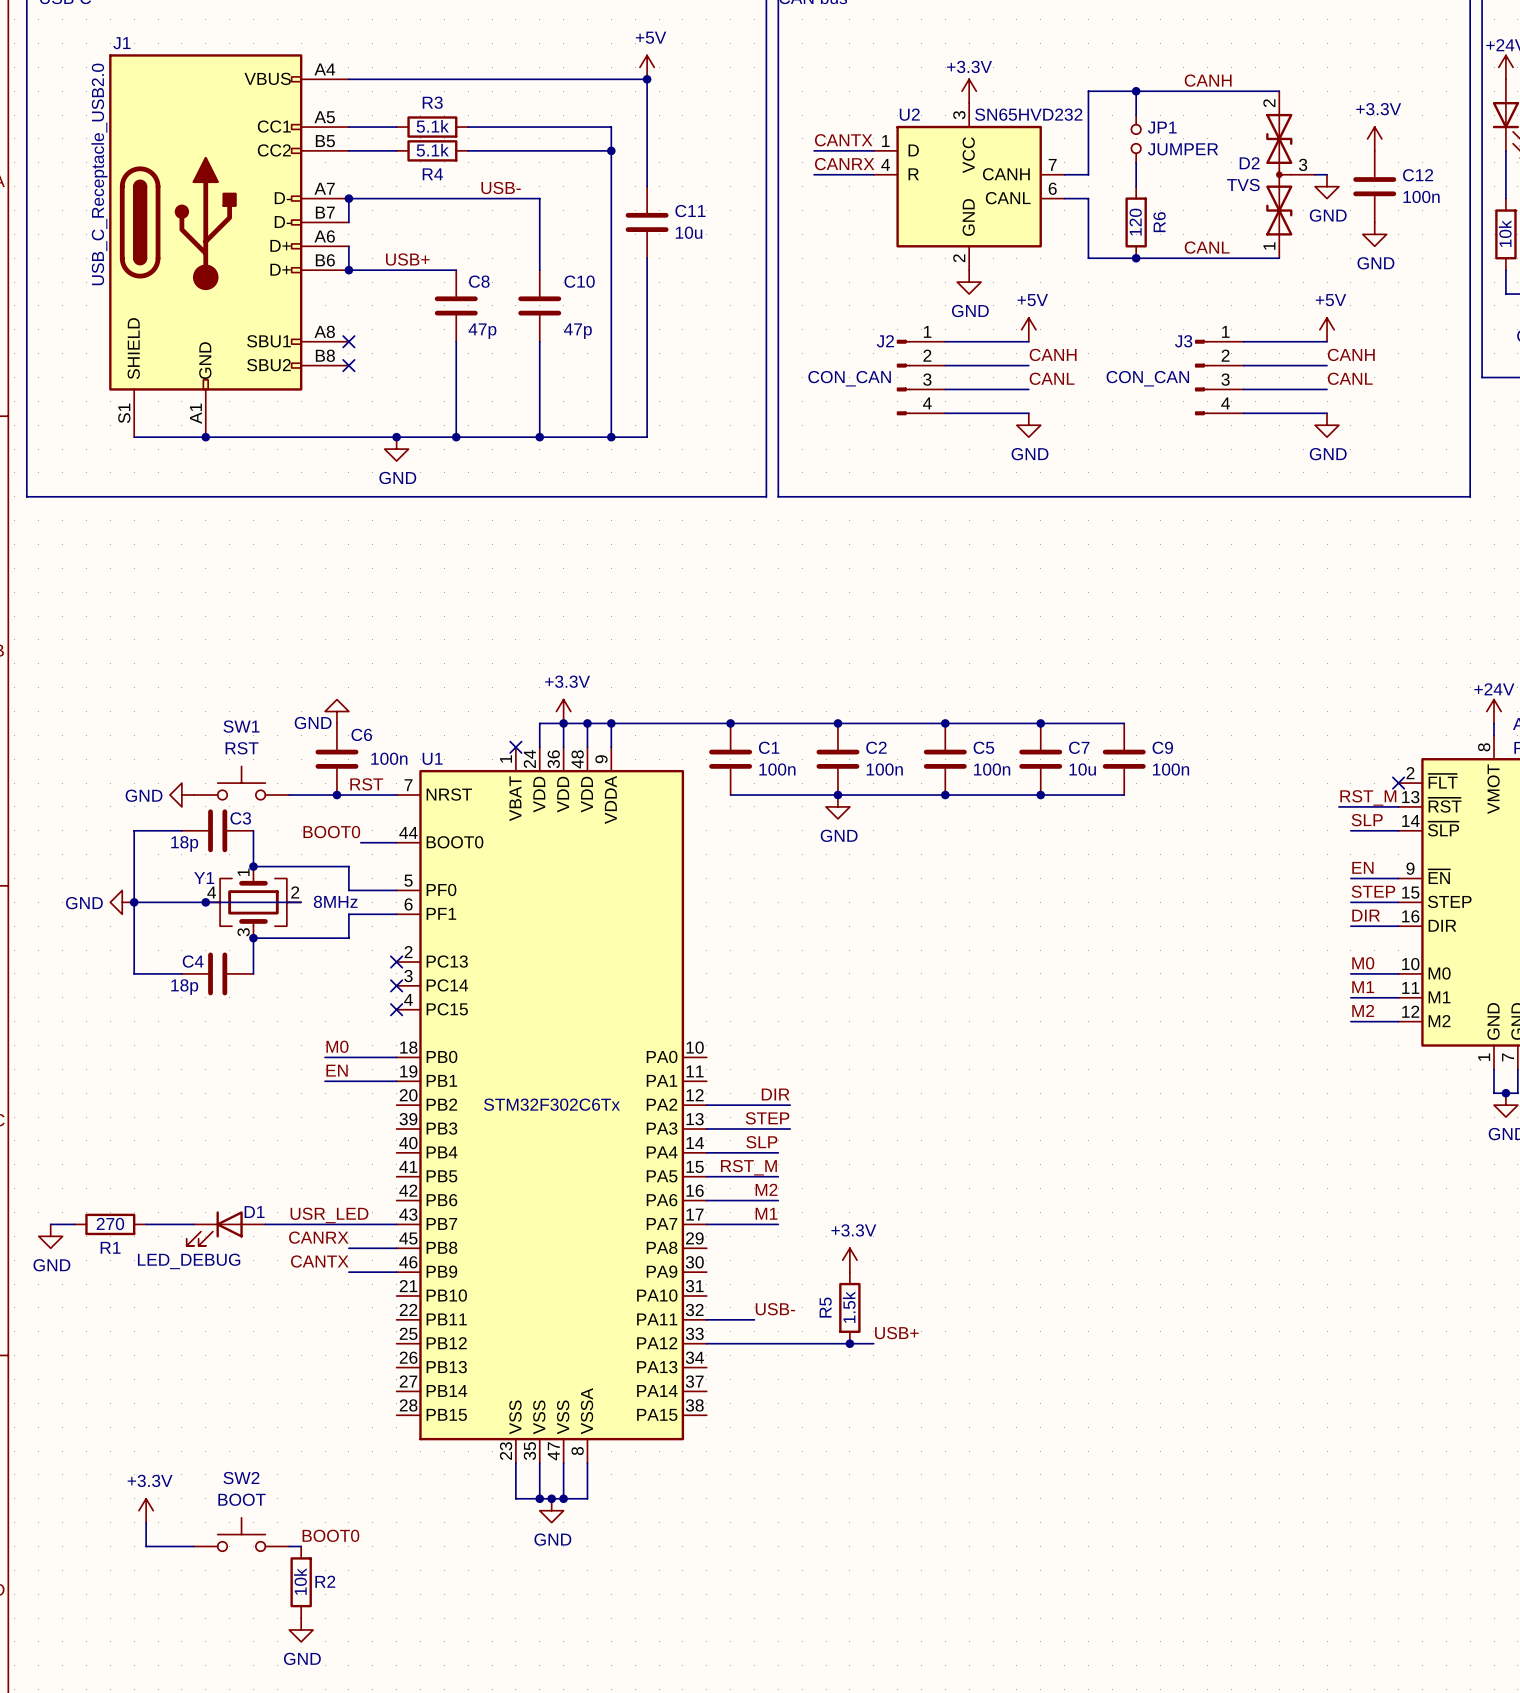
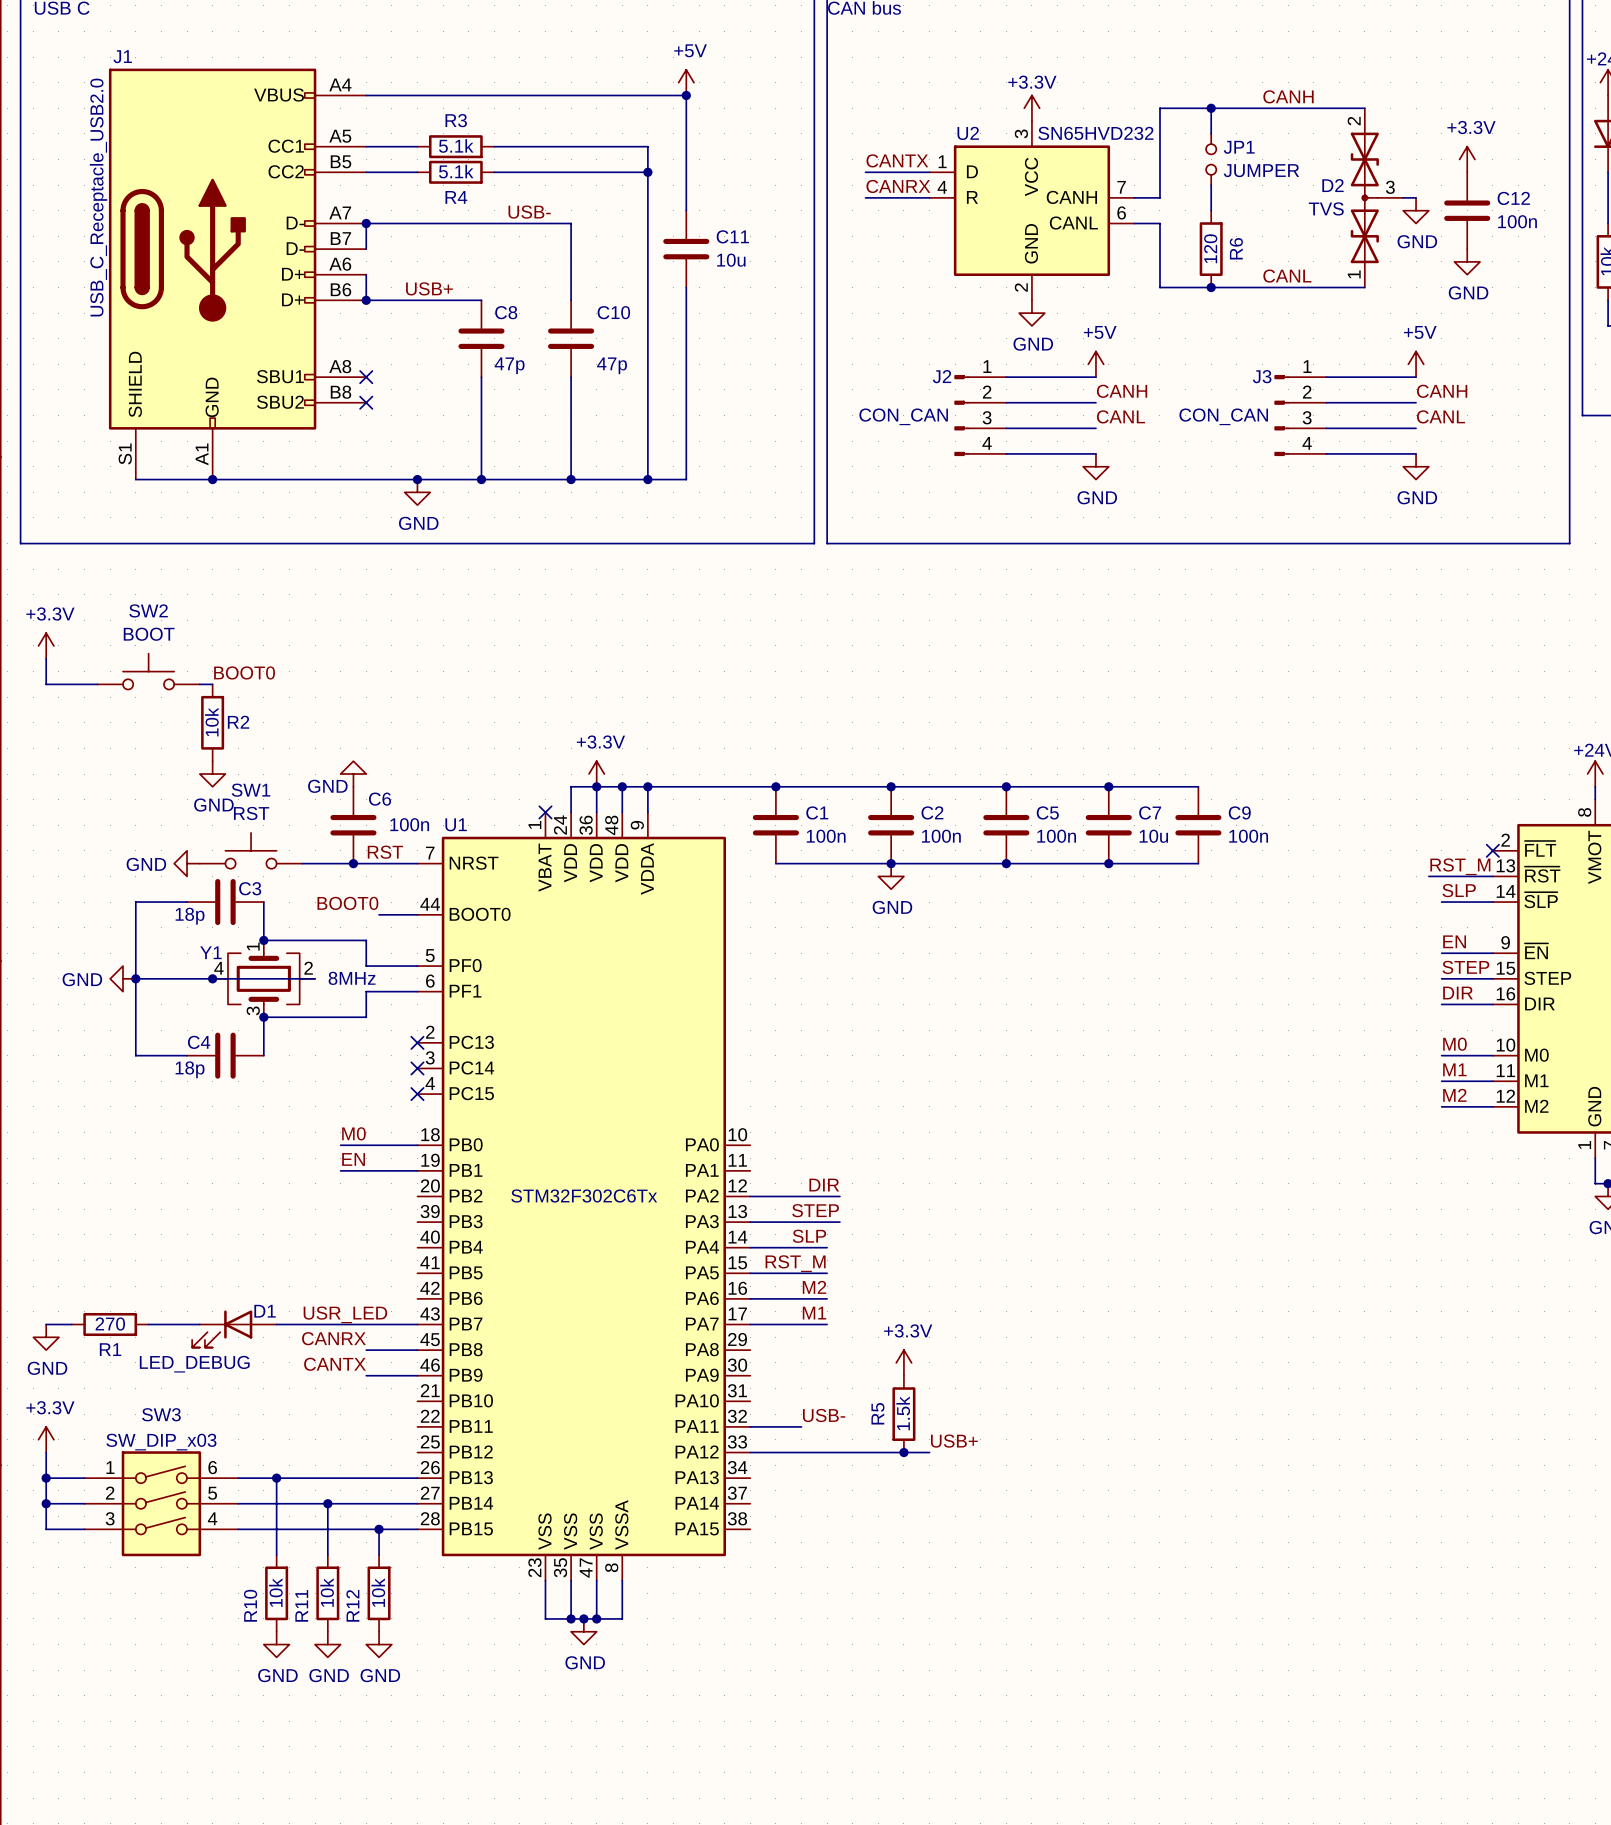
power symbol: none -> +3.3V (46, 645)
wire: none -> (46, 658) (46, 684) (97, 684)
label: none -> BOOT0 (244, 672)
wire: none -> (199, 684) (212, 684)
power symbol: none -> GND (212, 774)
wire: none -> (46, 1452) (46, 1529) (84, 1529)
wire: none -> (46, 1478) (84, 1478)
junction: none -> (46, 1478)
wire: none -> (238, 1478) (417, 1478)
wire: none -> (276, 1478) (276, 1554)
junction: none -> (276, 1478)
wire: none -> (46, 1503) (84, 1503)
junction: none -> (46, 1503)
SW3: none -> SW_DIP_x03 (161, 1503)
wire: none -> (238, 1503) (417, 1503)
wire: none -> (327, 1503) (327, 1554)
junction: none -> (327, 1503)
wire: none -> (238, 1529) (417, 1529)
wire: none -> (379, 1529) (379, 1554)
junction: none -> (379, 1529)
R10: none -> 10k (276, 1593)
R11: none -> 10k (327, 1593)
R12: none -> 10k (379, 1593)
power symbol position: +3.3V (146, 1510) -> +3.3V (46, 1439)
wire: (146, 1522) (146, 1546) (193, 1546) -> none
power symbol: none -> GND (276, 1644)
power symbol: none -> GND (327, 1644)
power symbol: none -> GND (379, 1644)
SW2 position: (241, 1534) -> (148, 671)
label: BOOT0 (330, 1535) -> none
wire: (289, 1546) (301, 1546) -> none
R2 position: (301, 1582) -> (212, 722)
power symbol: GND (301, 1629) -> none

